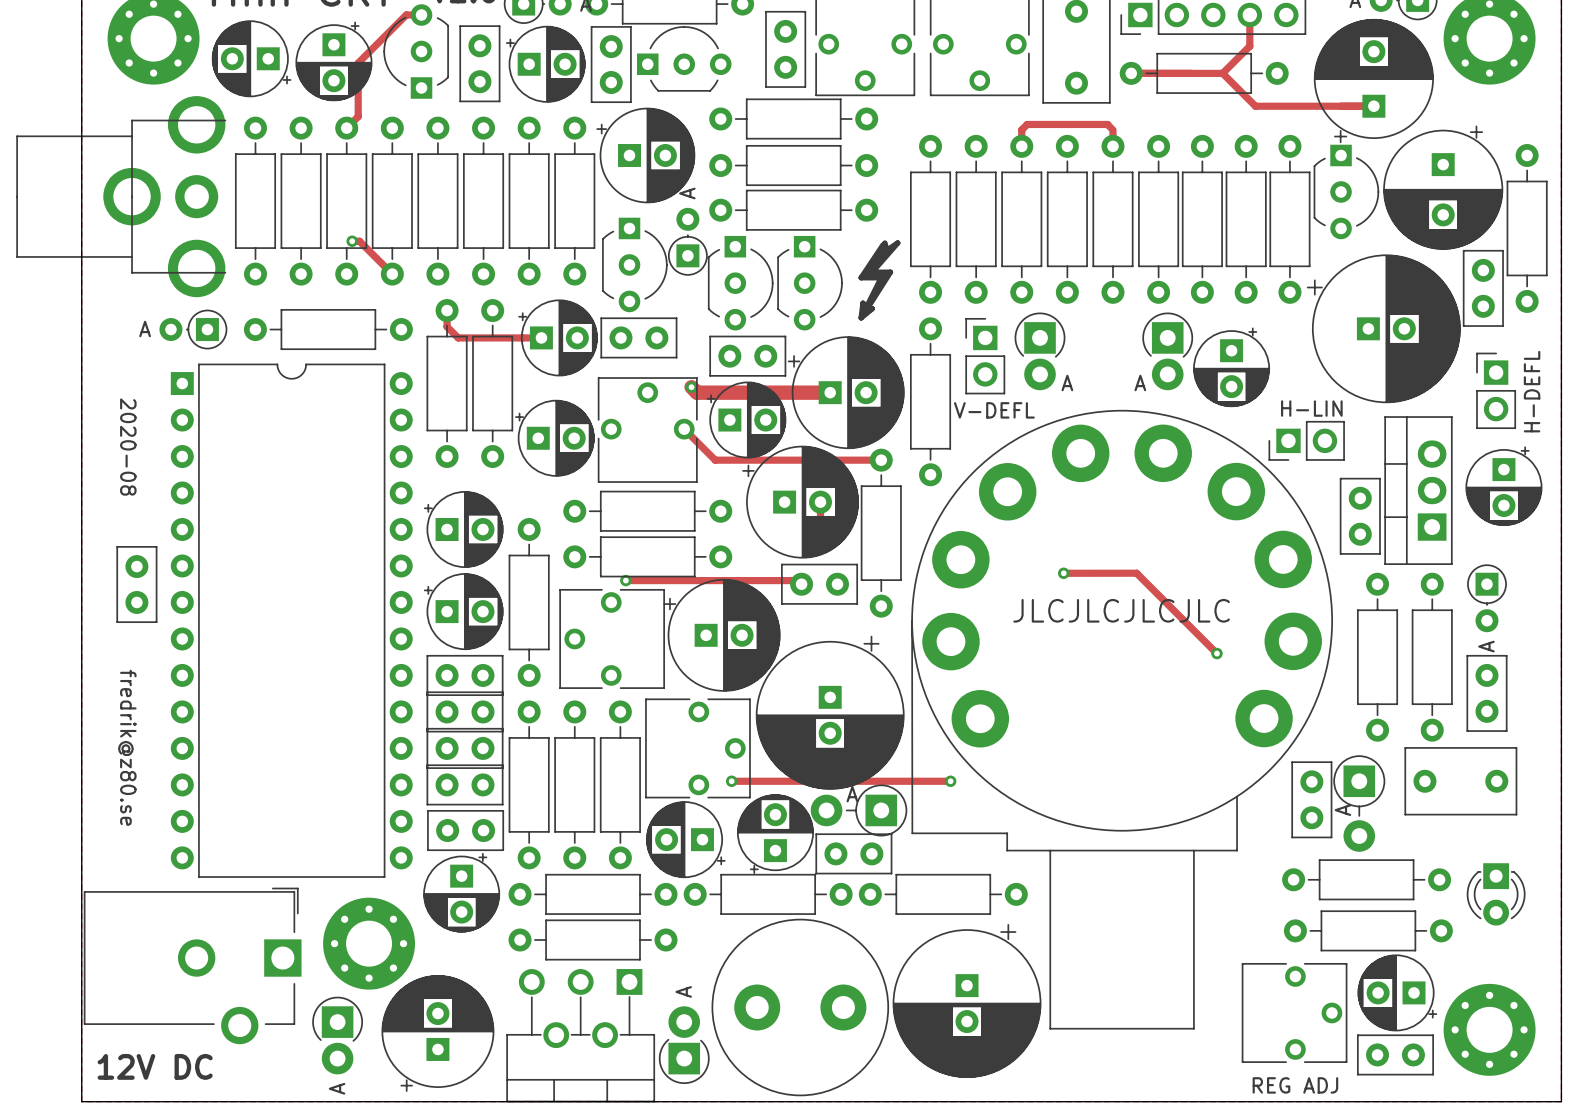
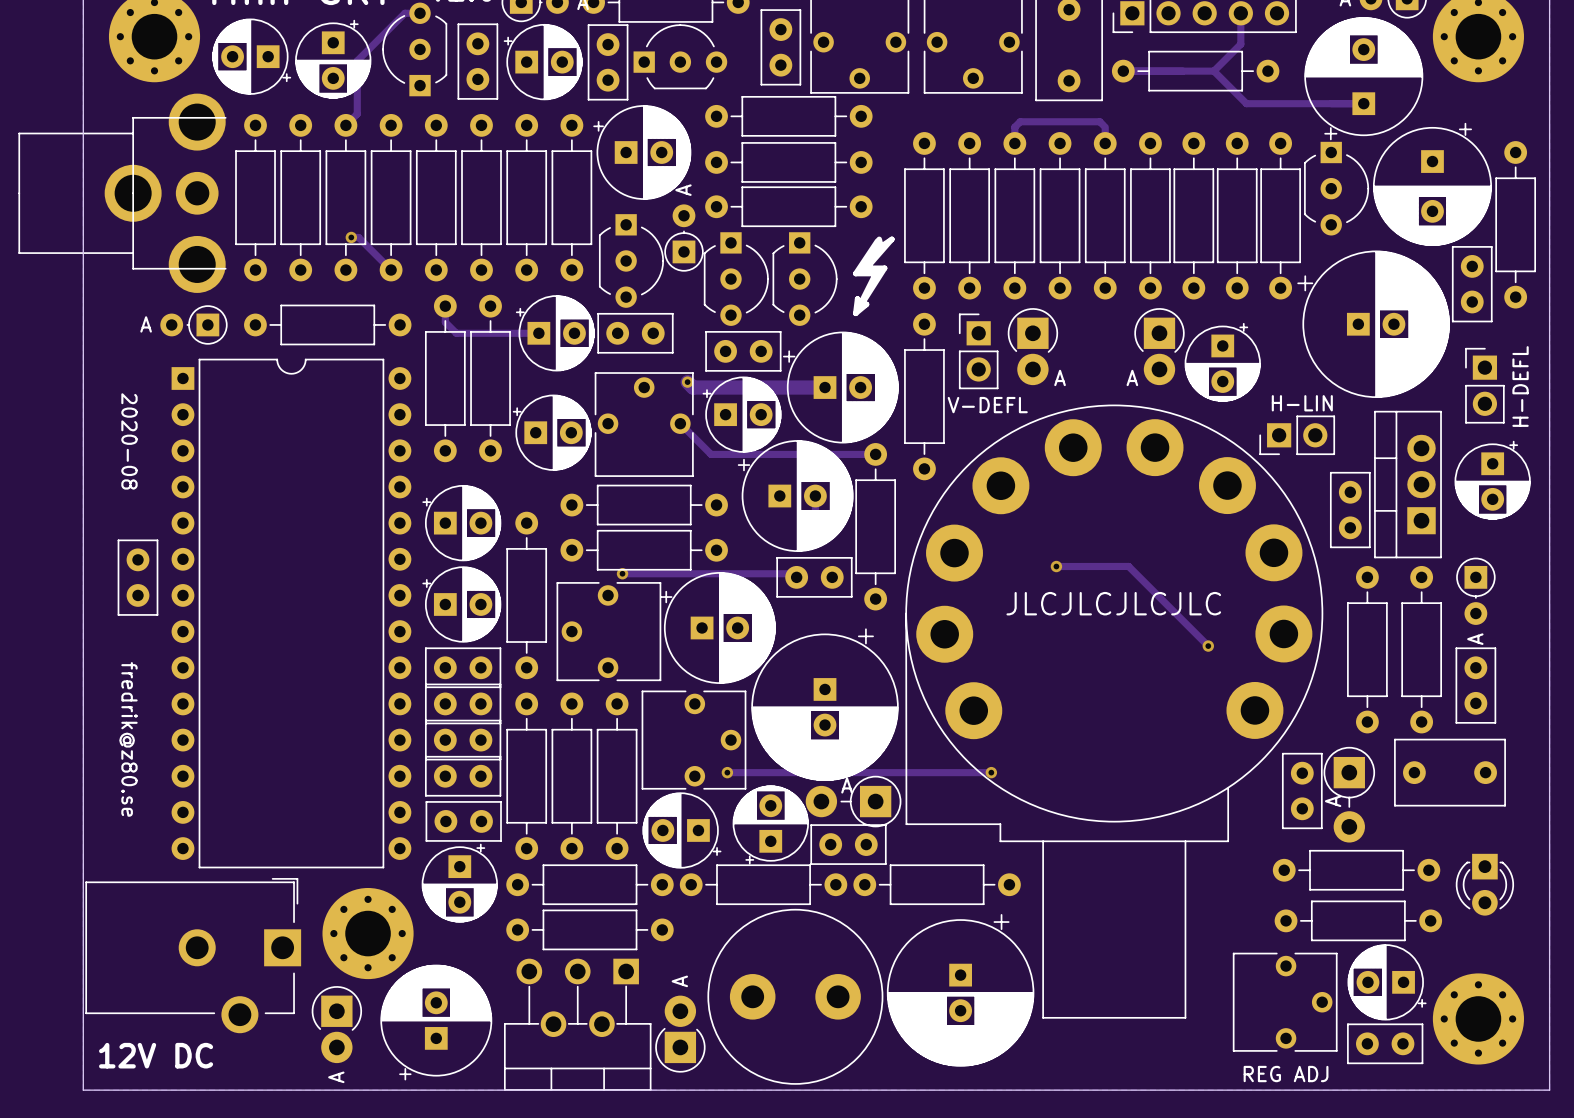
track: none -> (944, 772) (991, 772)
via position: (950, 781) -> (991, 772)

